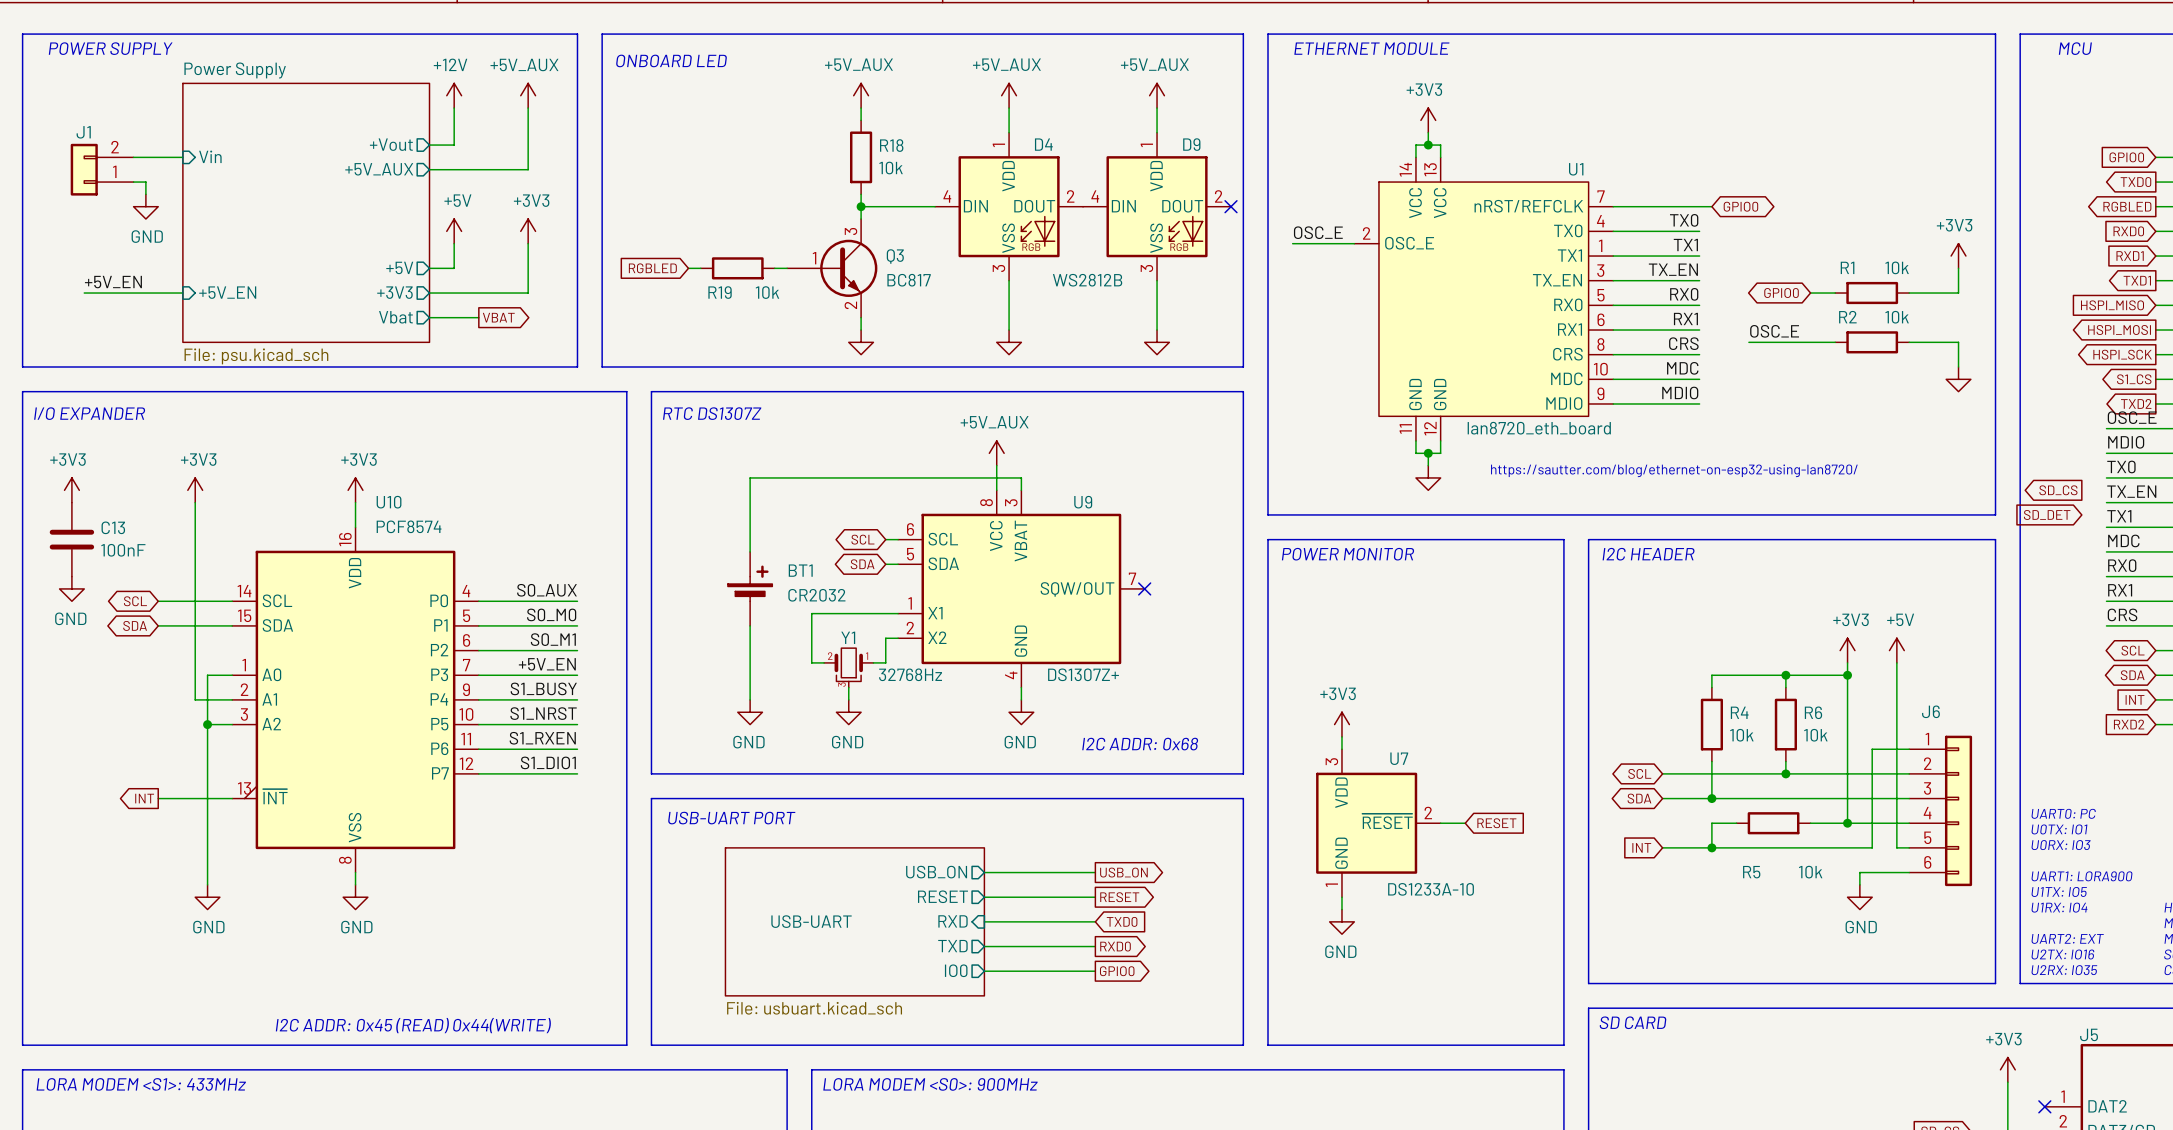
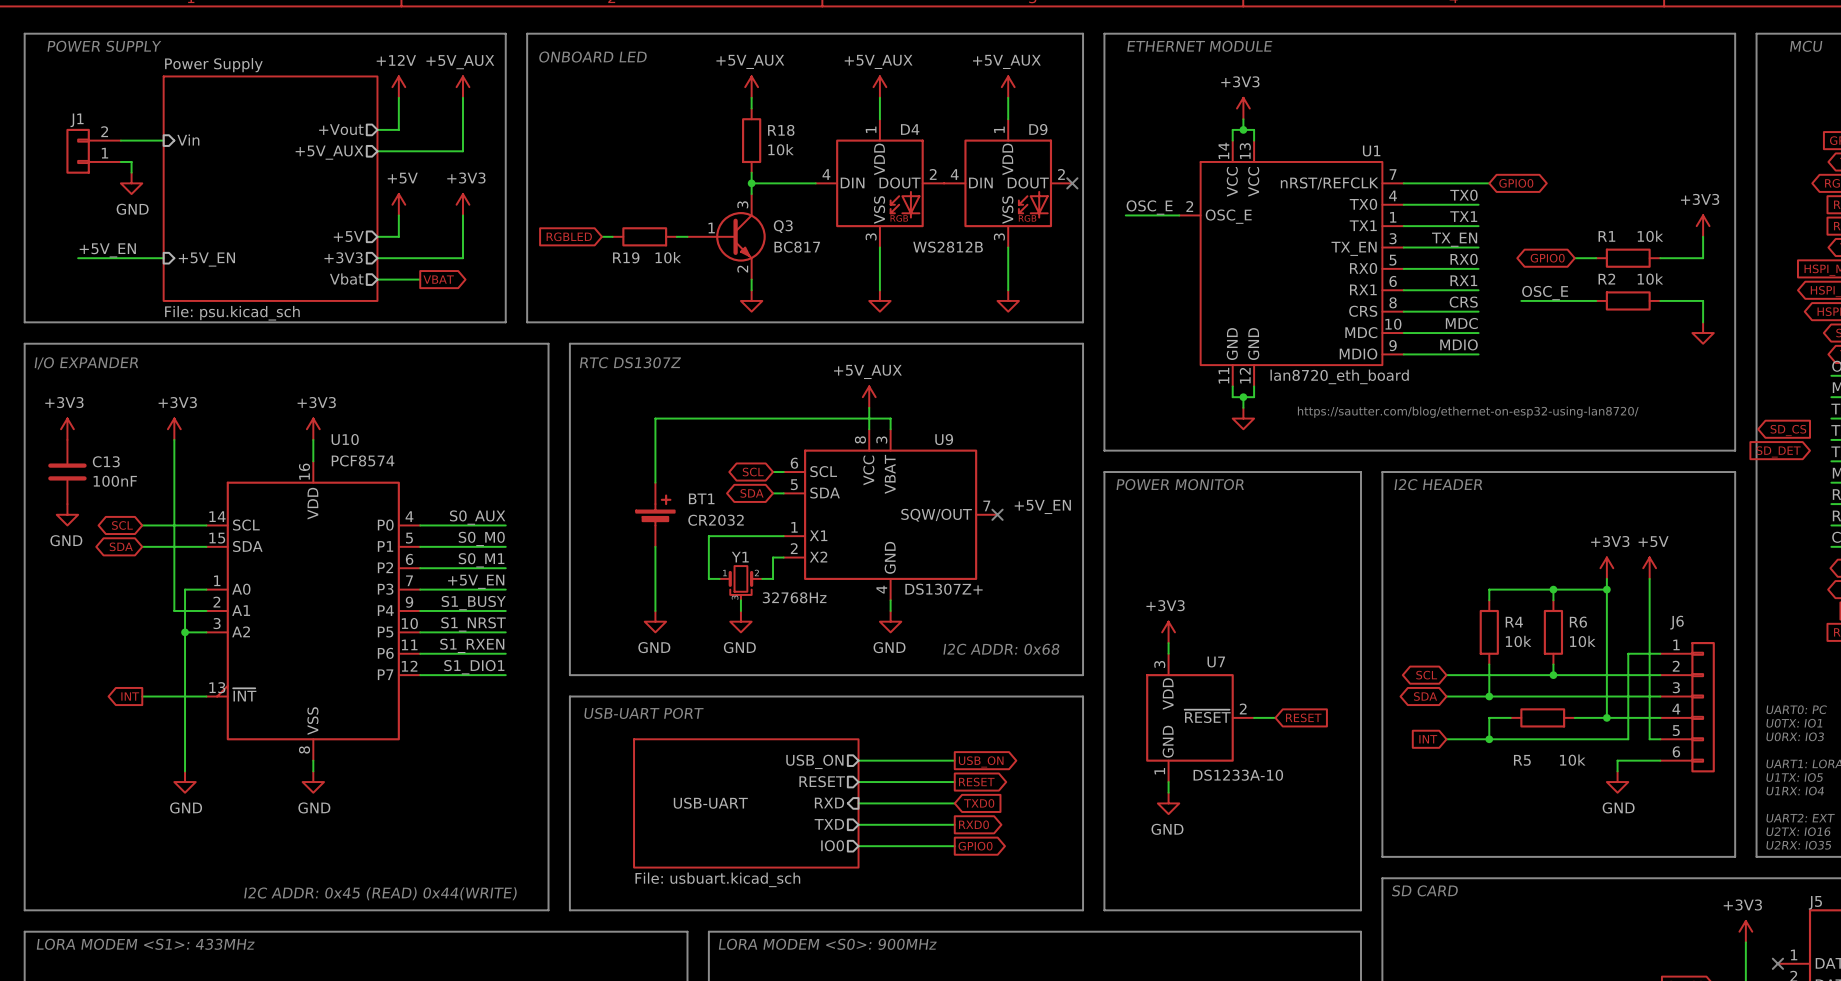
label: none -> +5V_EN (1042, 506)
Y1 flip: as is (848, 664) -> left-right (740, 580)

